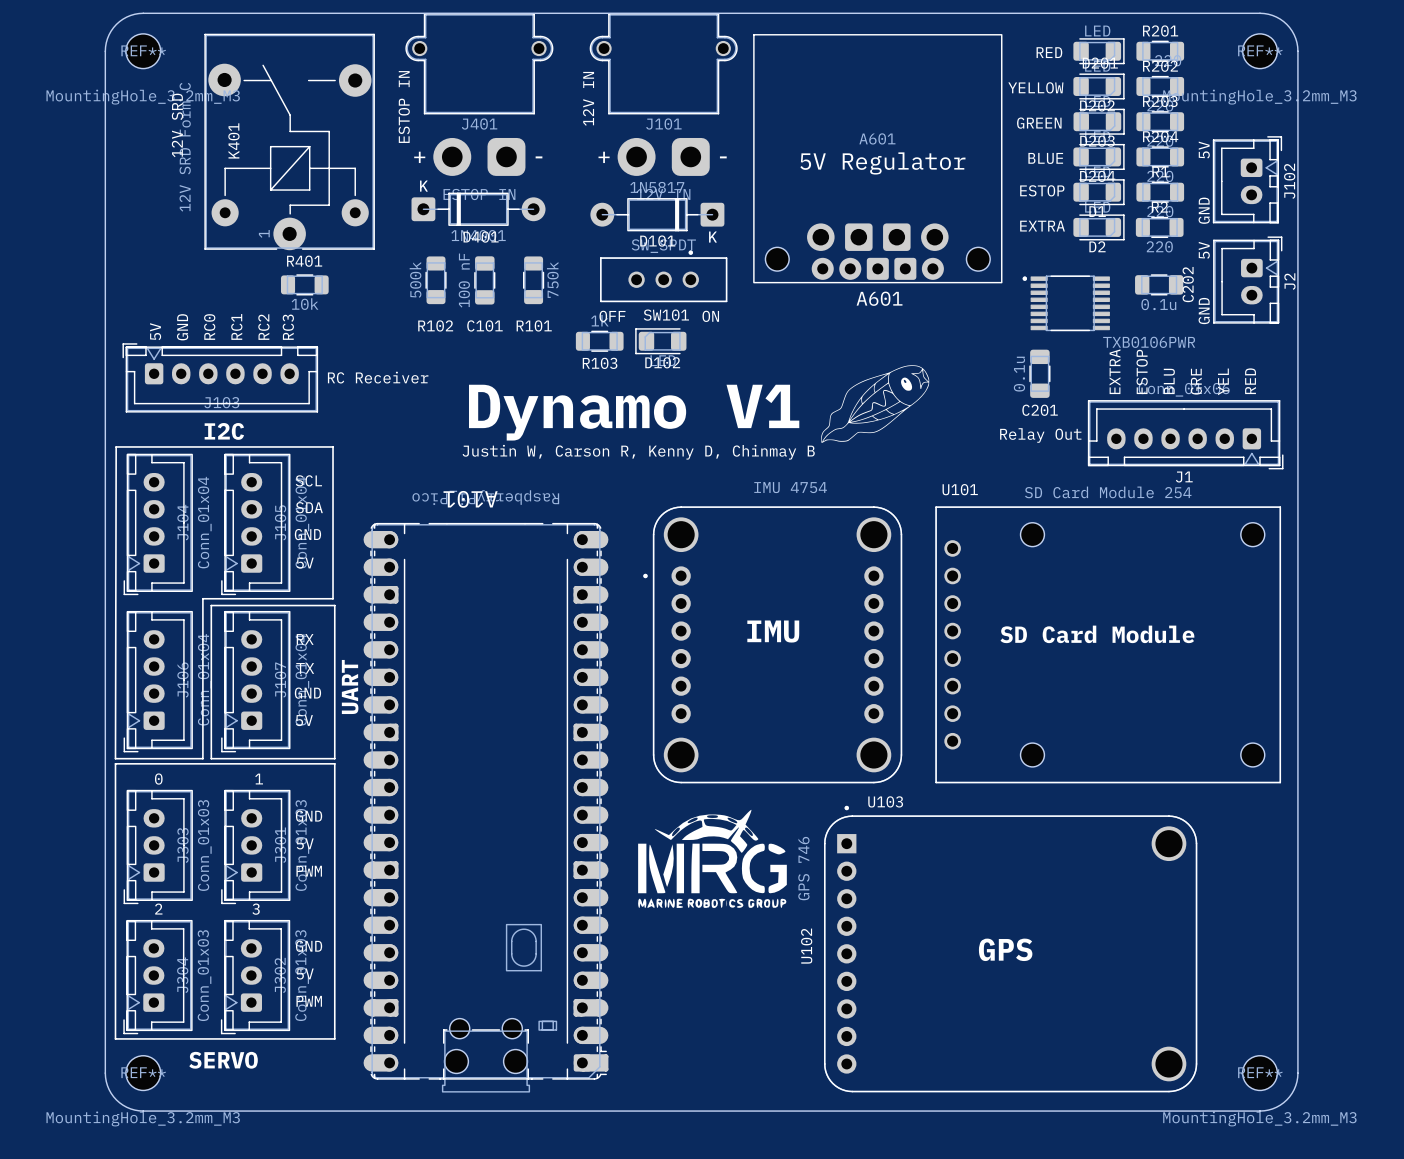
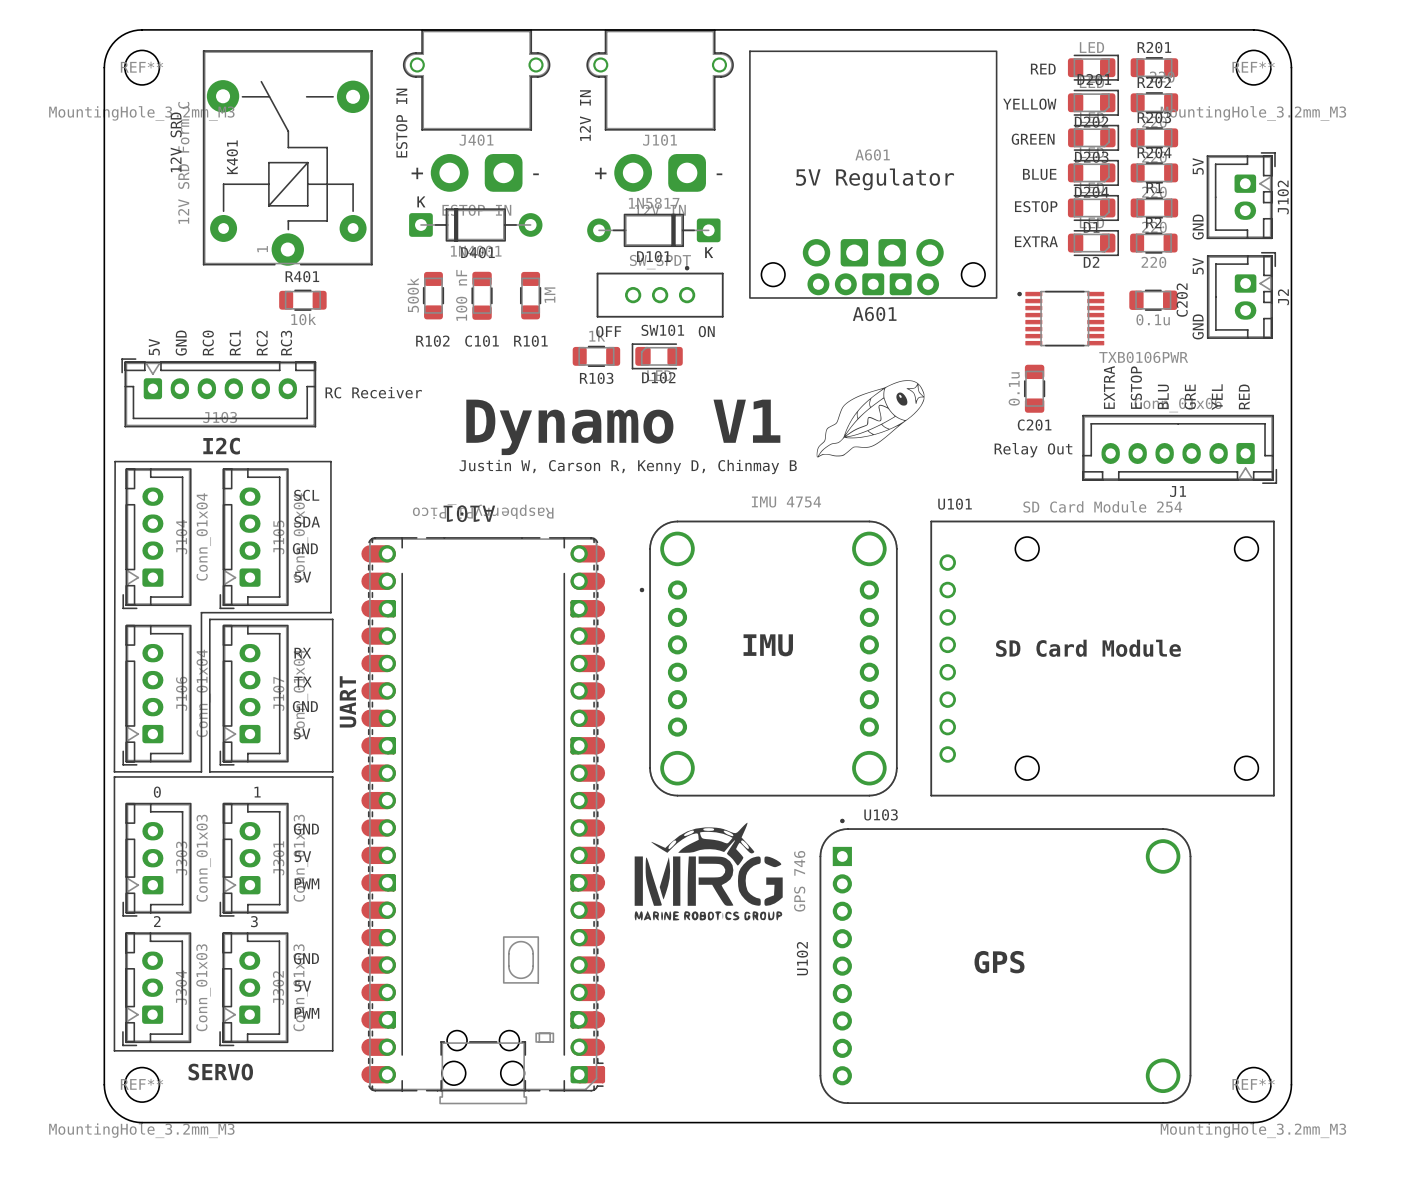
R101 value: 750k (552, 279) -> 1M (549, 295)

